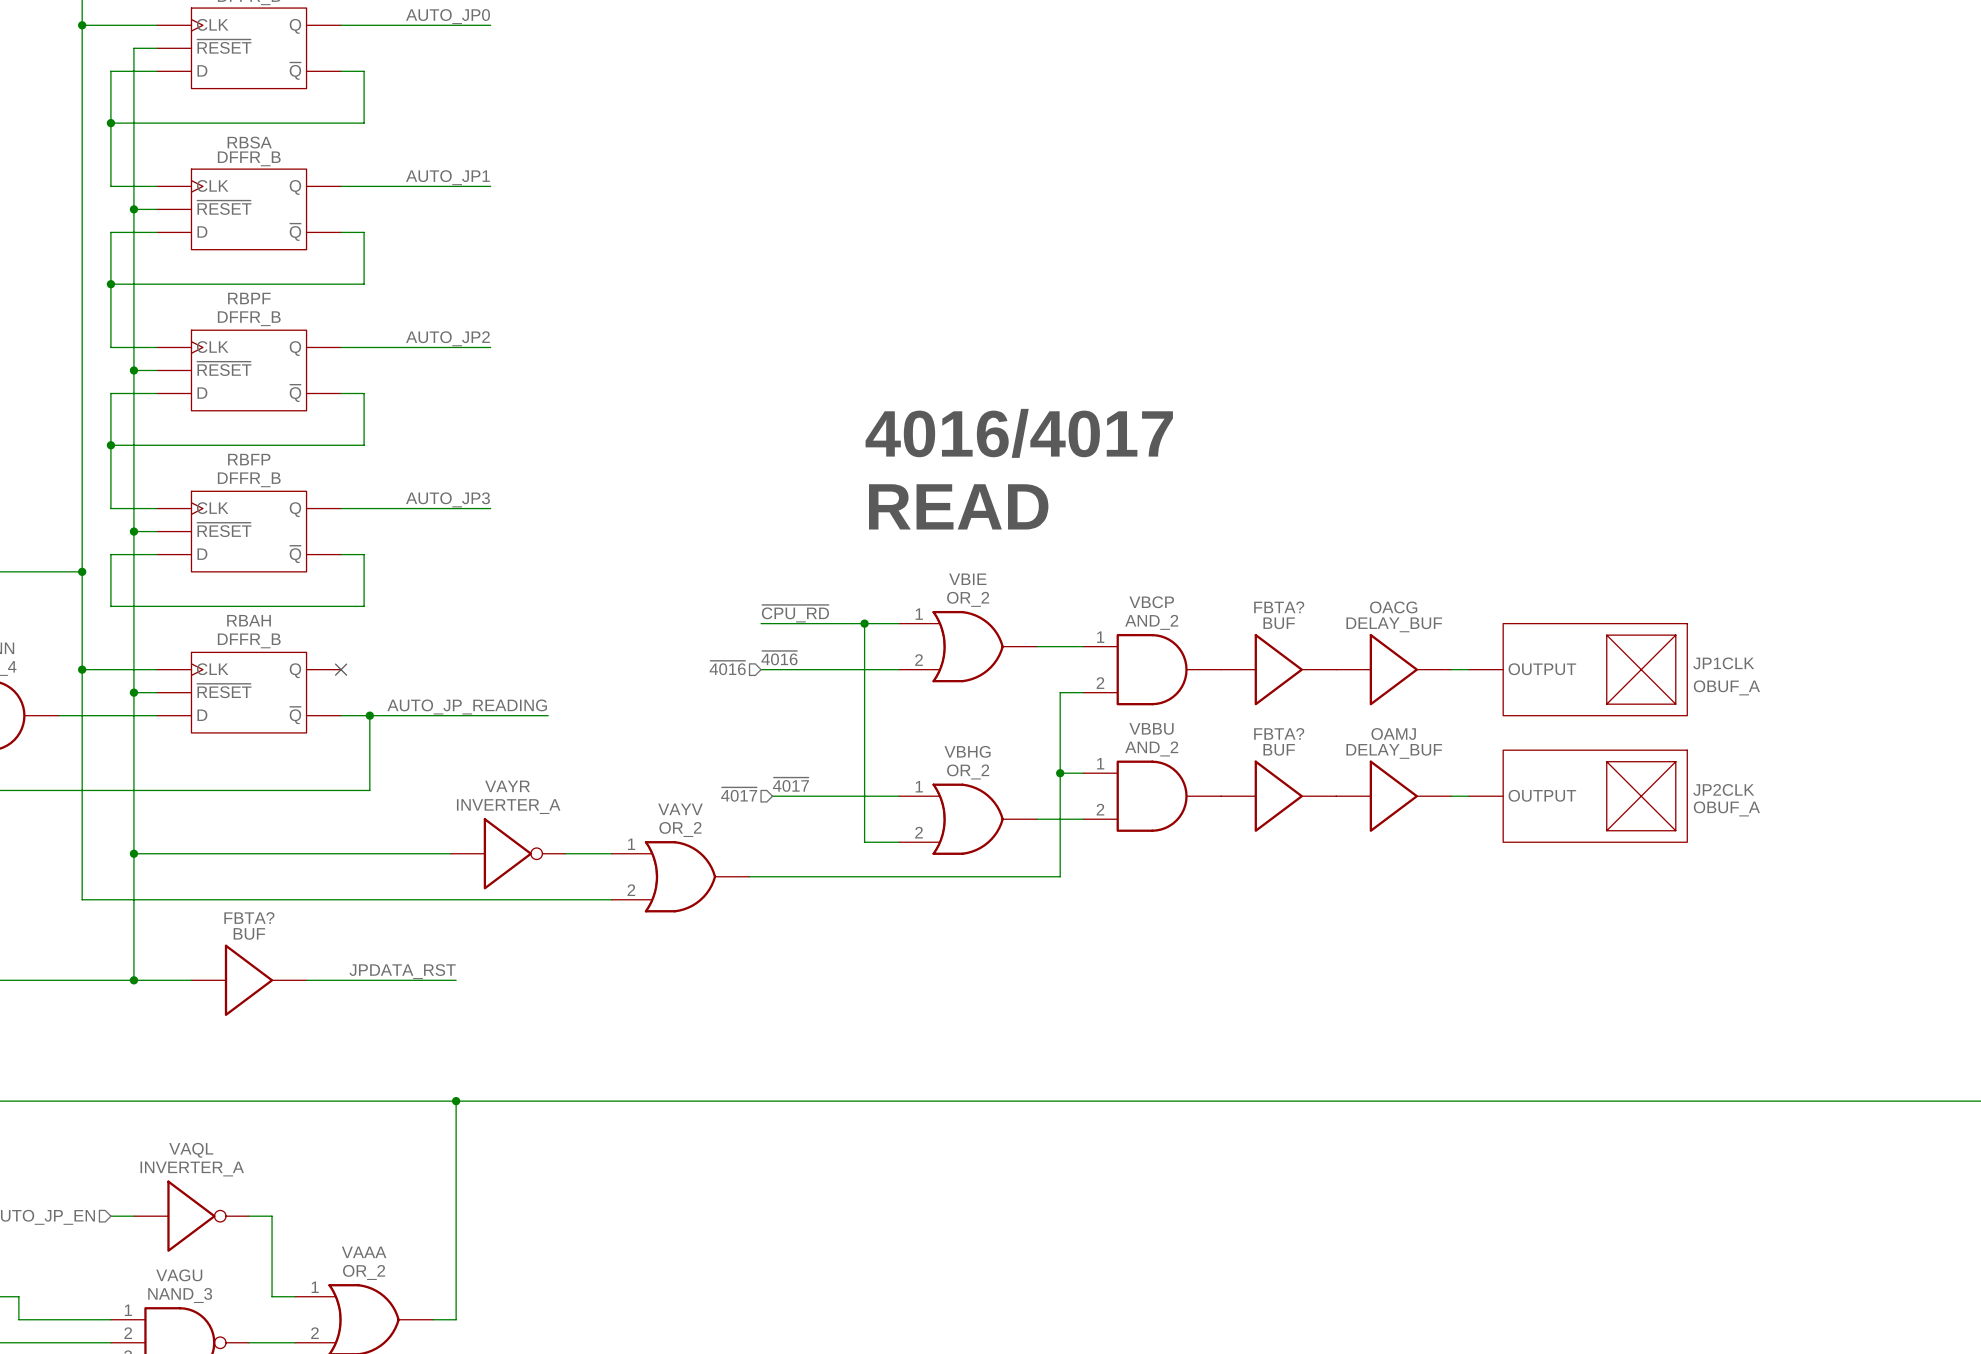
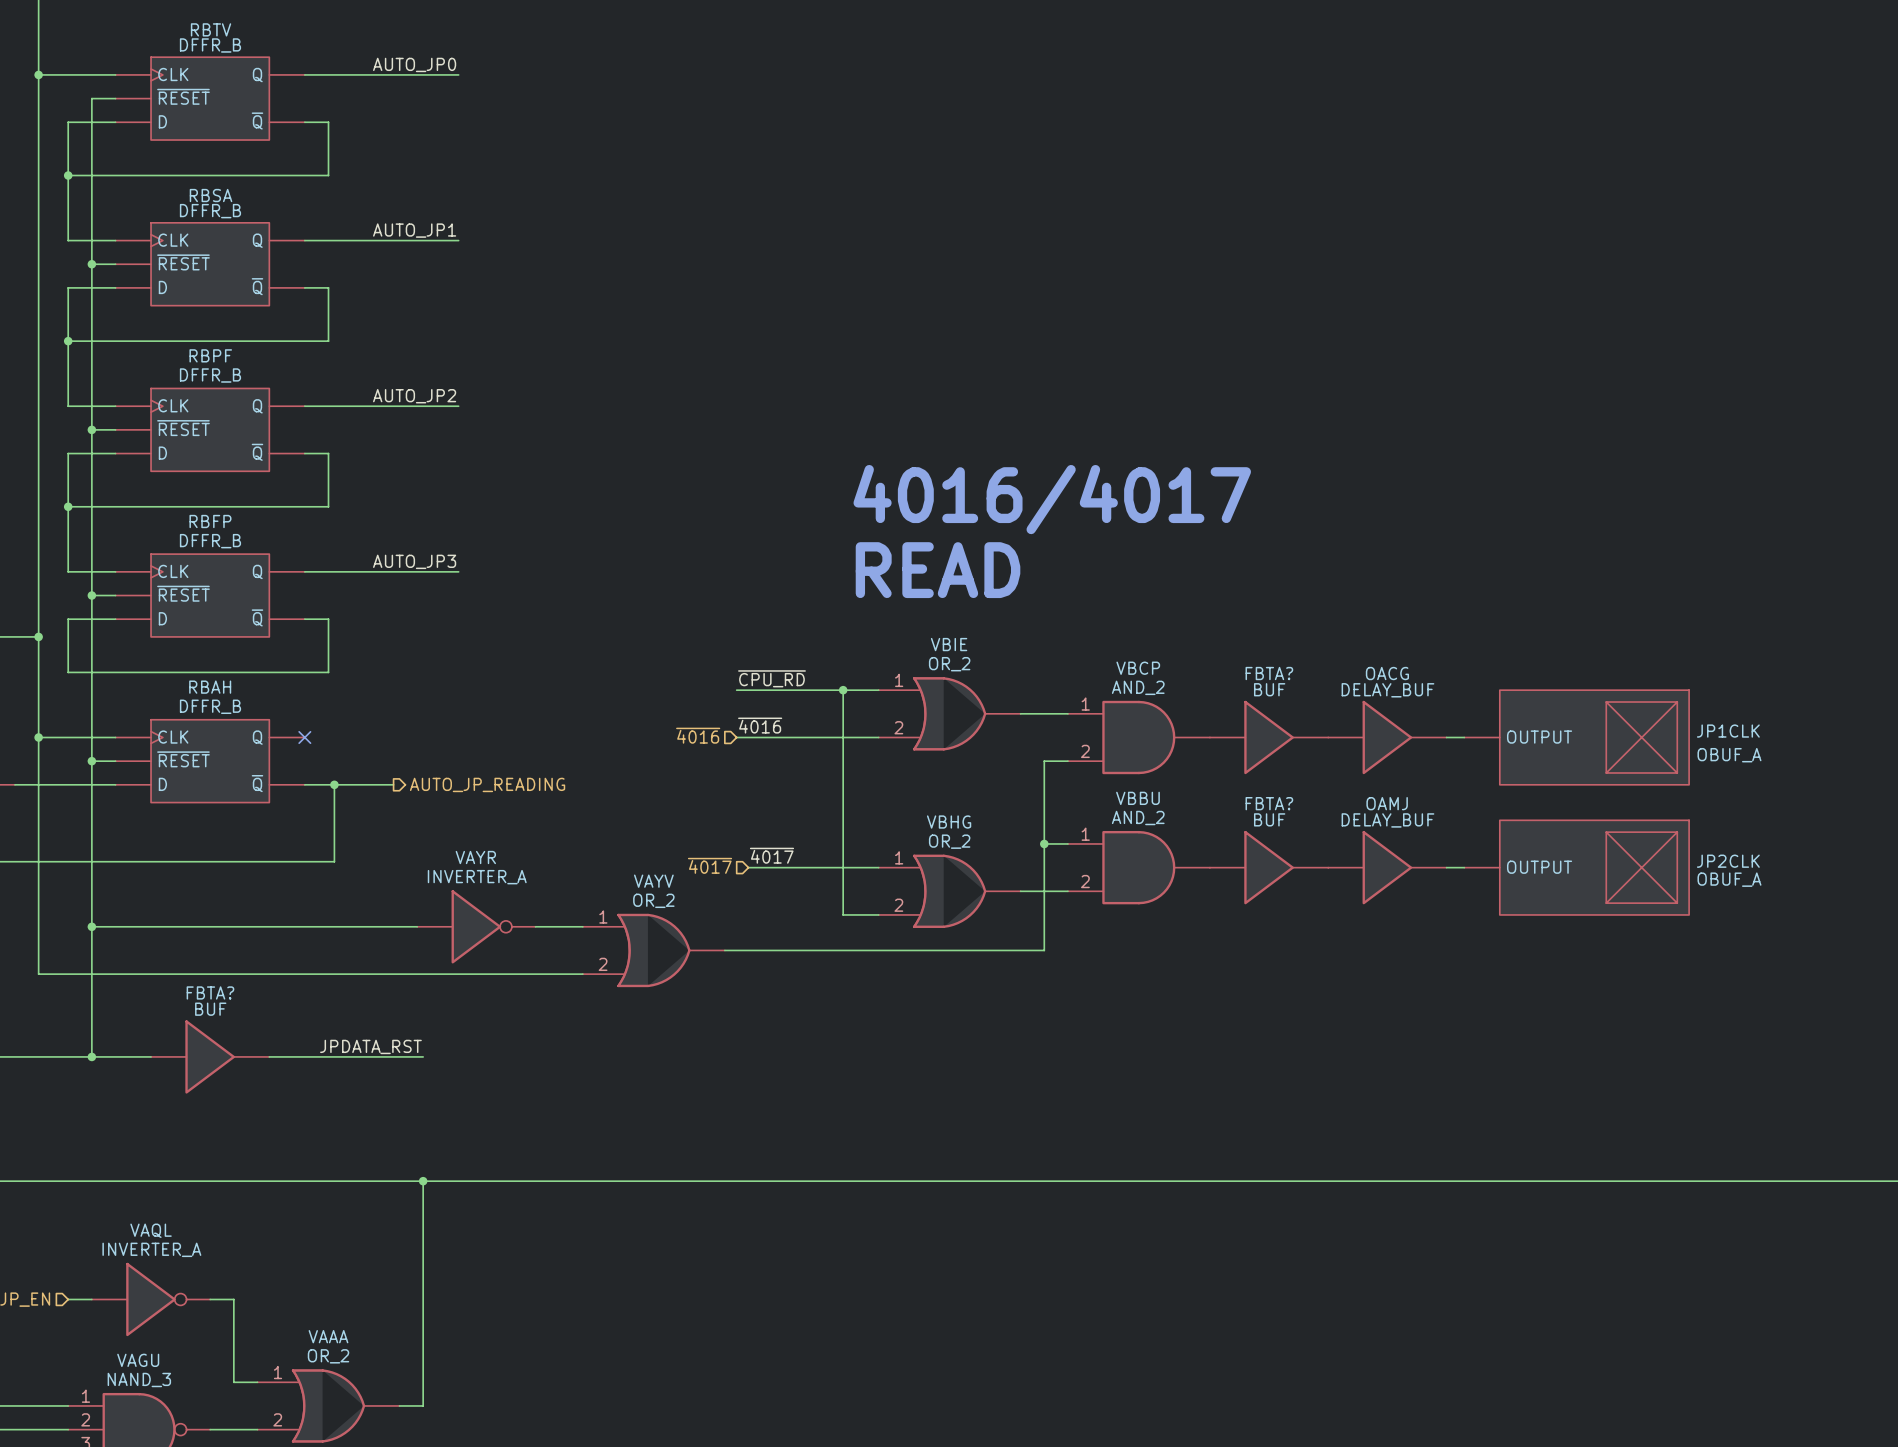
label: AUTO_JP_READING (467, 706) -> none
wire: (427, 715) (548, 715) -> none
hierarchical label: none -> AUTO_JP_READING (487, 784)

